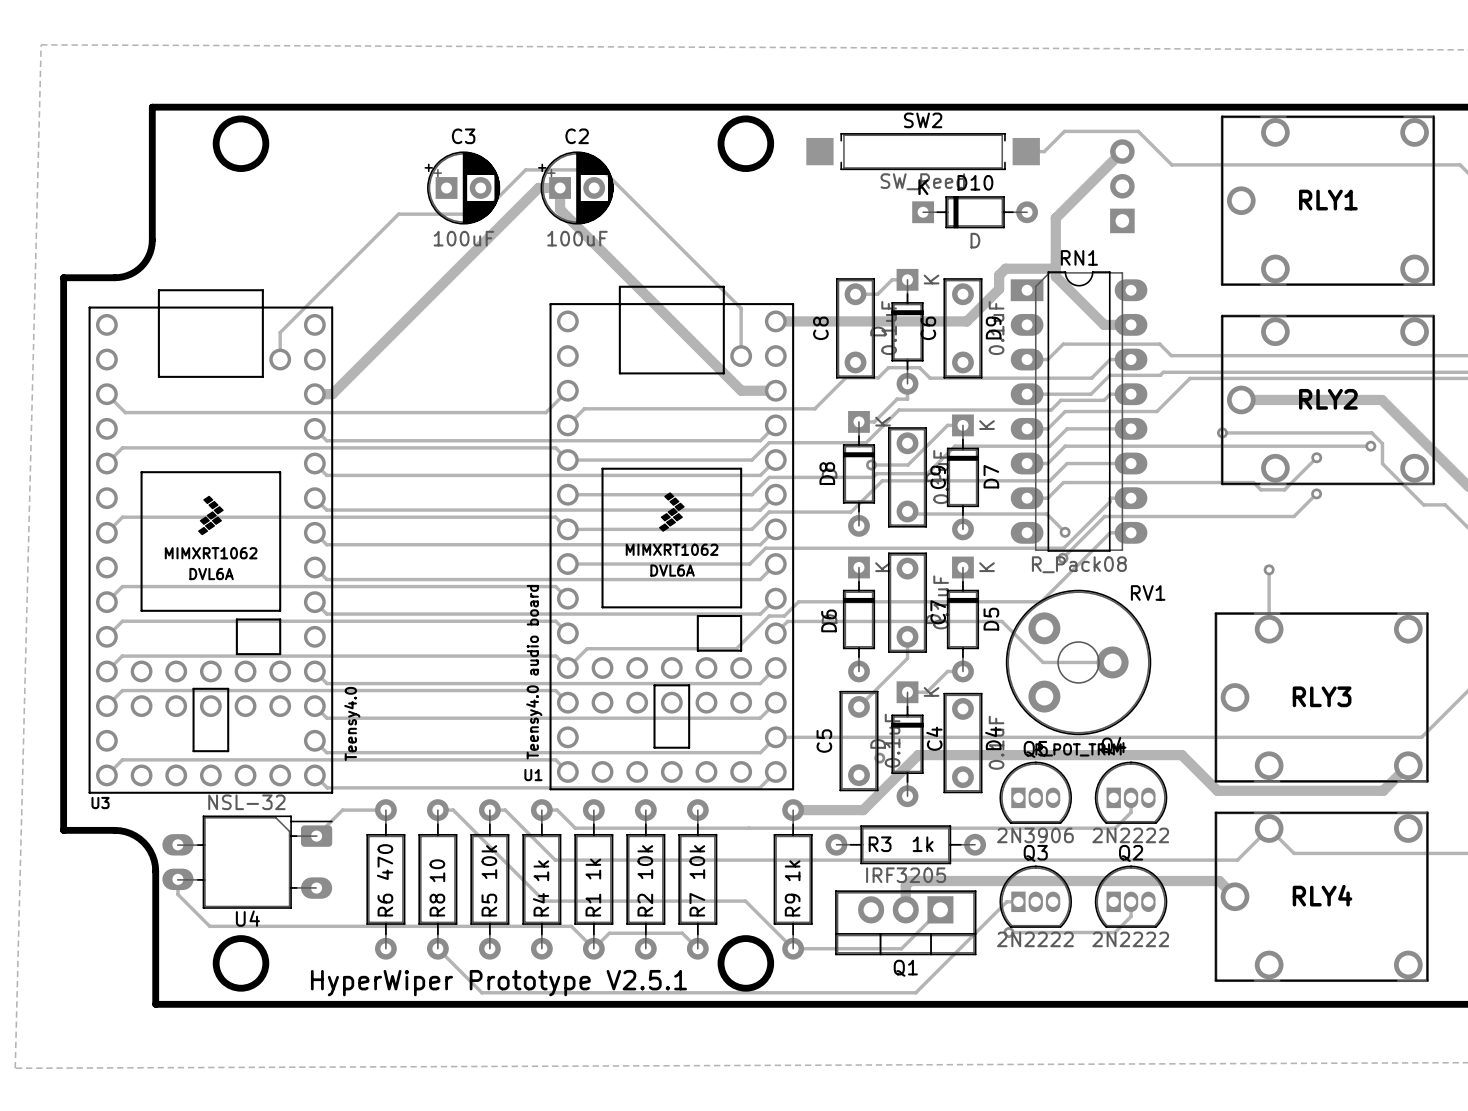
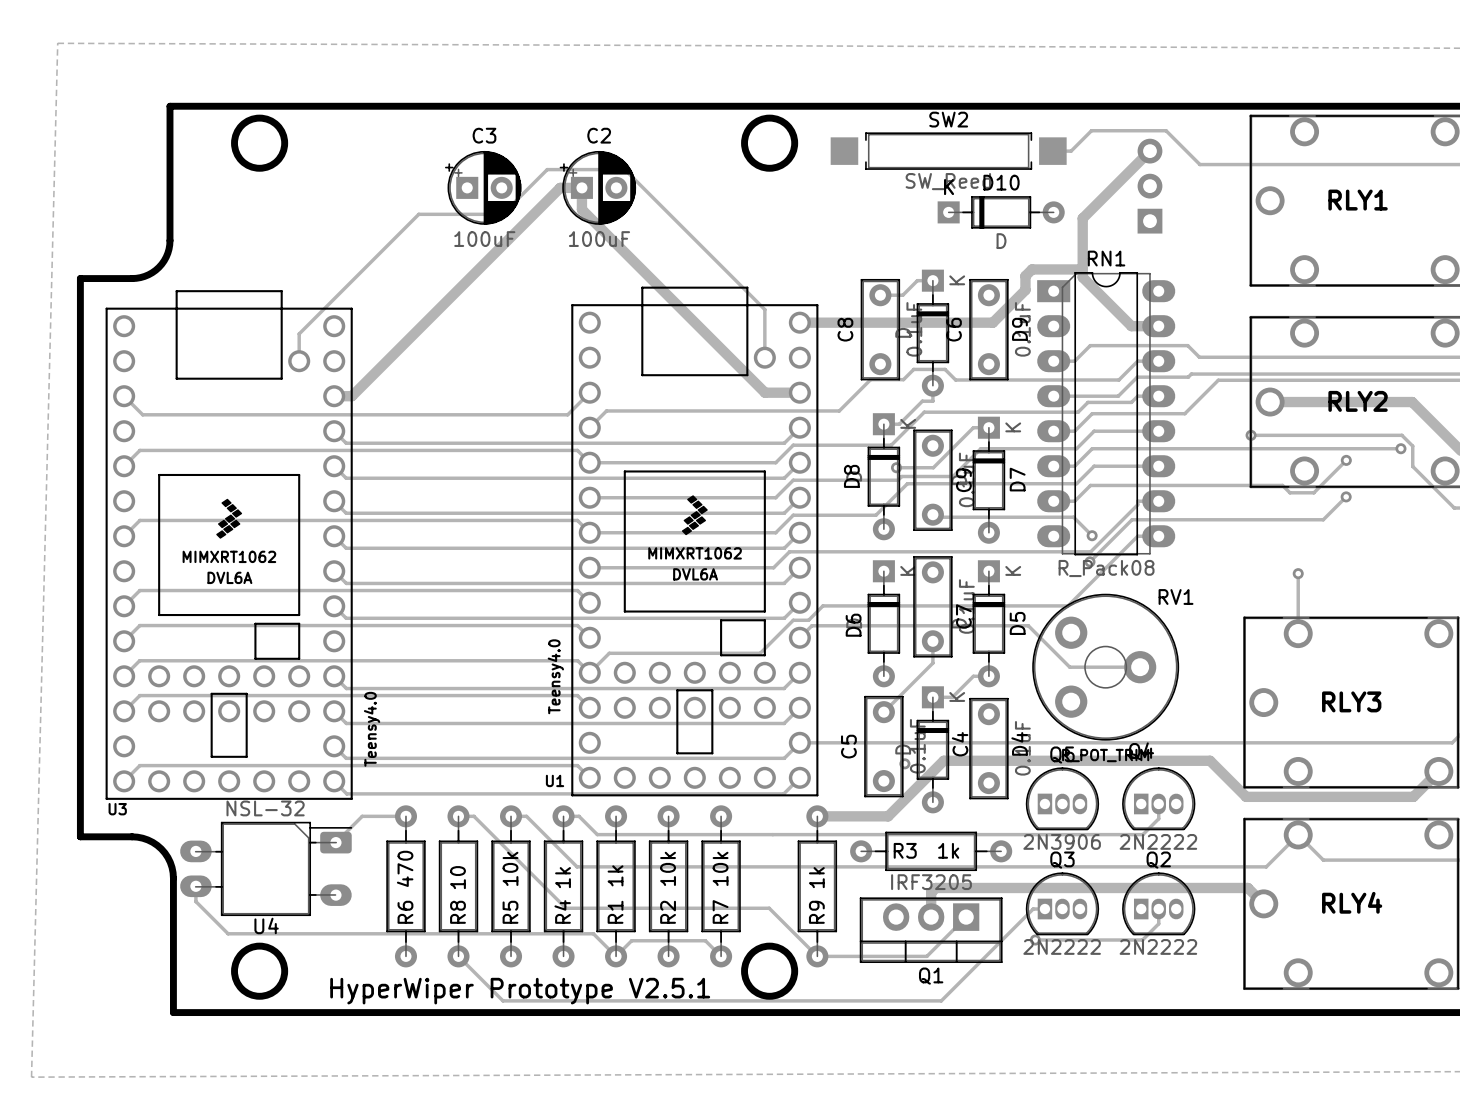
U1 value: Teensy4.0 audio board (534, 672) -> Teensy4.0 (555, 676)

